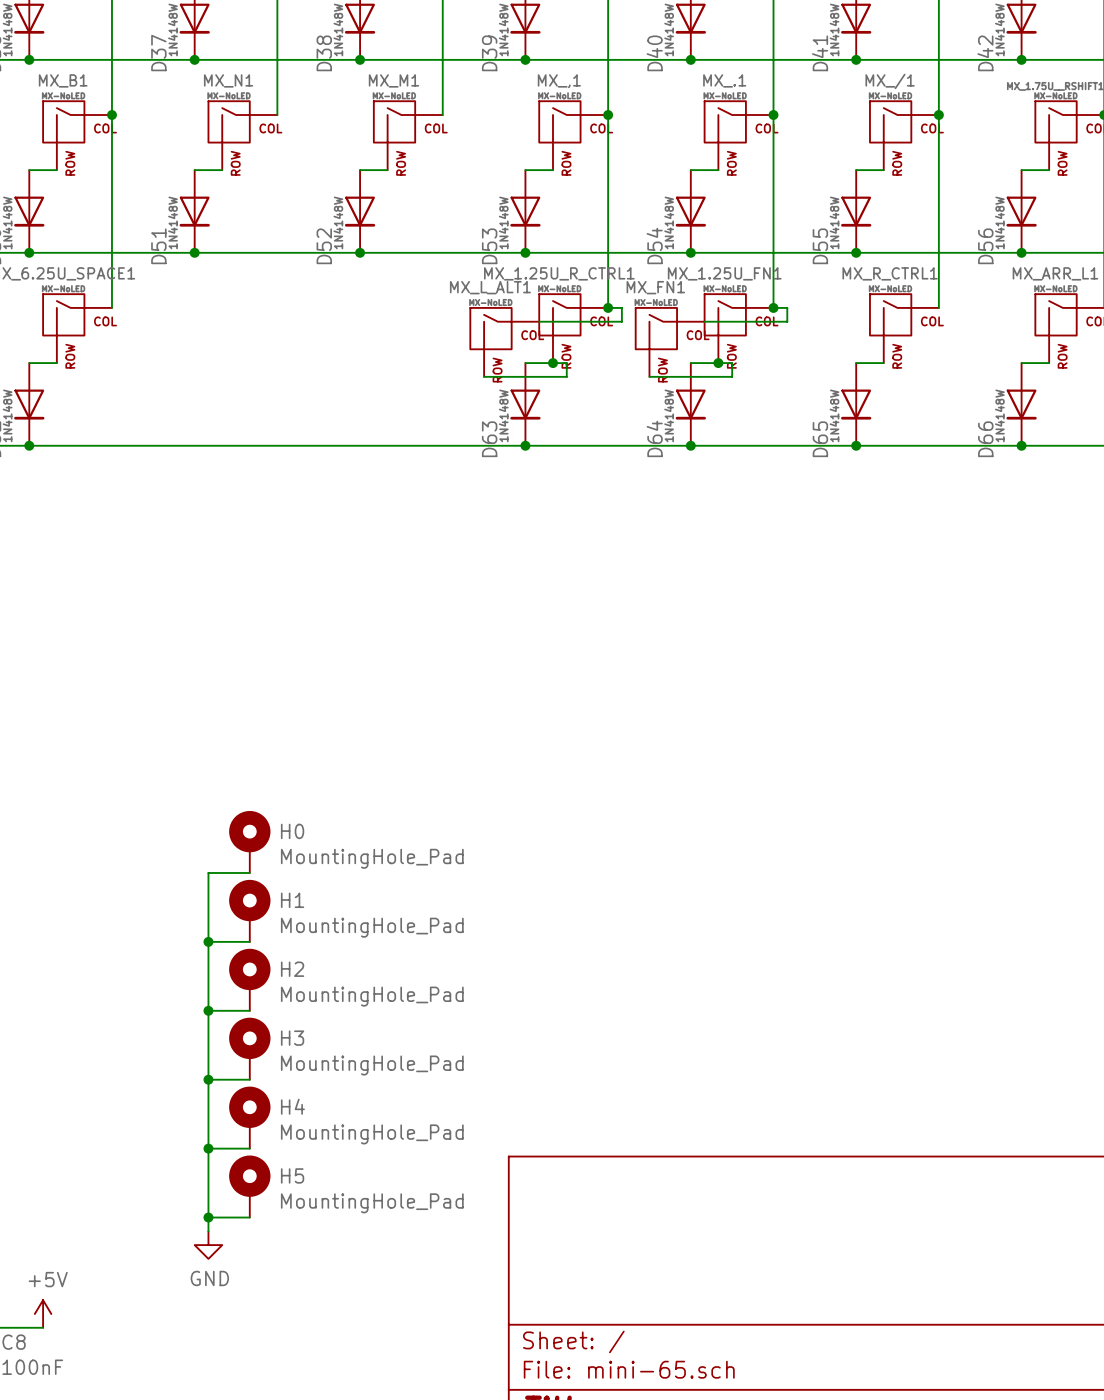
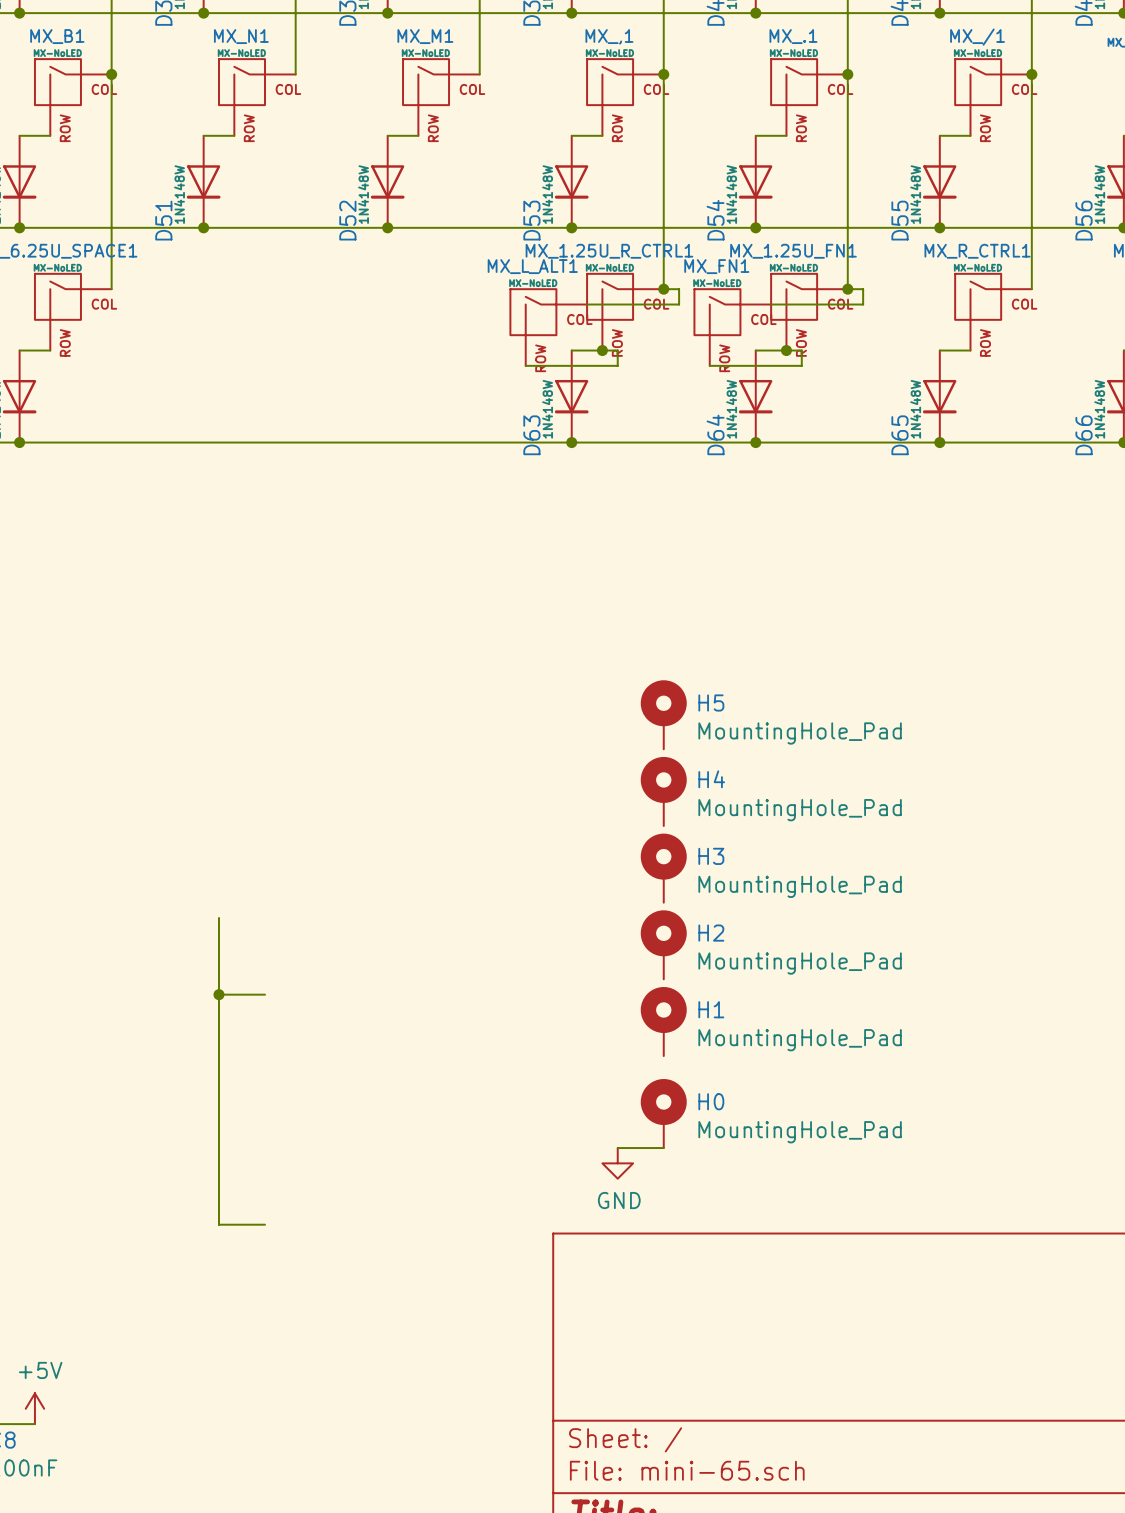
H0 position: (249, 841) -> (663, 1113)
wire: (208, 872) (249, 872) -> none
H1 position: (249, 910) -> (663, 1021)
H2 position: (249, 979) -> (663, 944)
wire: (208, 1010) (249, 1010) -> none
junction: (208, 1010) -> none
H3 position: (249, 1048) -> (663, 868)
wire: (208, 1079) (249, 1079) -> none
junction: (208, 1079) -> none
wire: none -> (617, 1148) (663, 1148)
power symbol: none -> GND (617, 1163)
H4 position: (249, 1117) -> (663, 791)
wire: (208, 1148) (208, 1231) -> none
junction: (208, 1148) -> none
H5 position: (249, 1186) -> (663, 714)
wire: (208, 1217) (249, 1217) -> none
junction: (208, 1217) -> none
power symbol: GND (208, 1245) -> none

